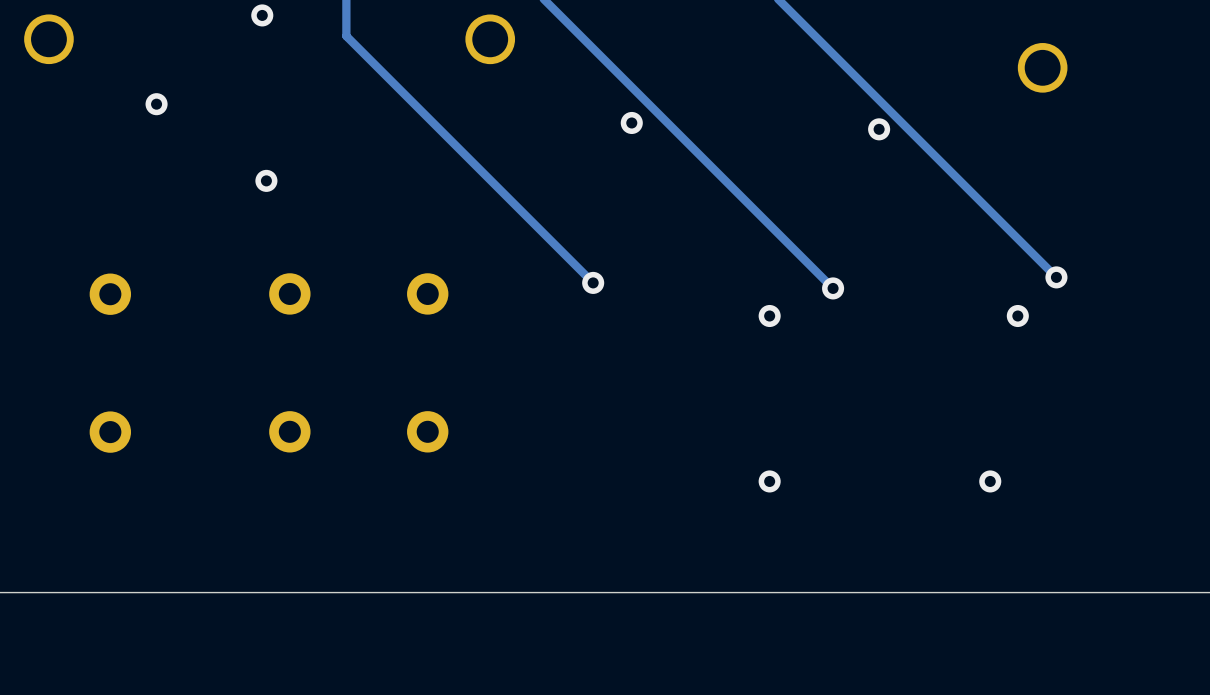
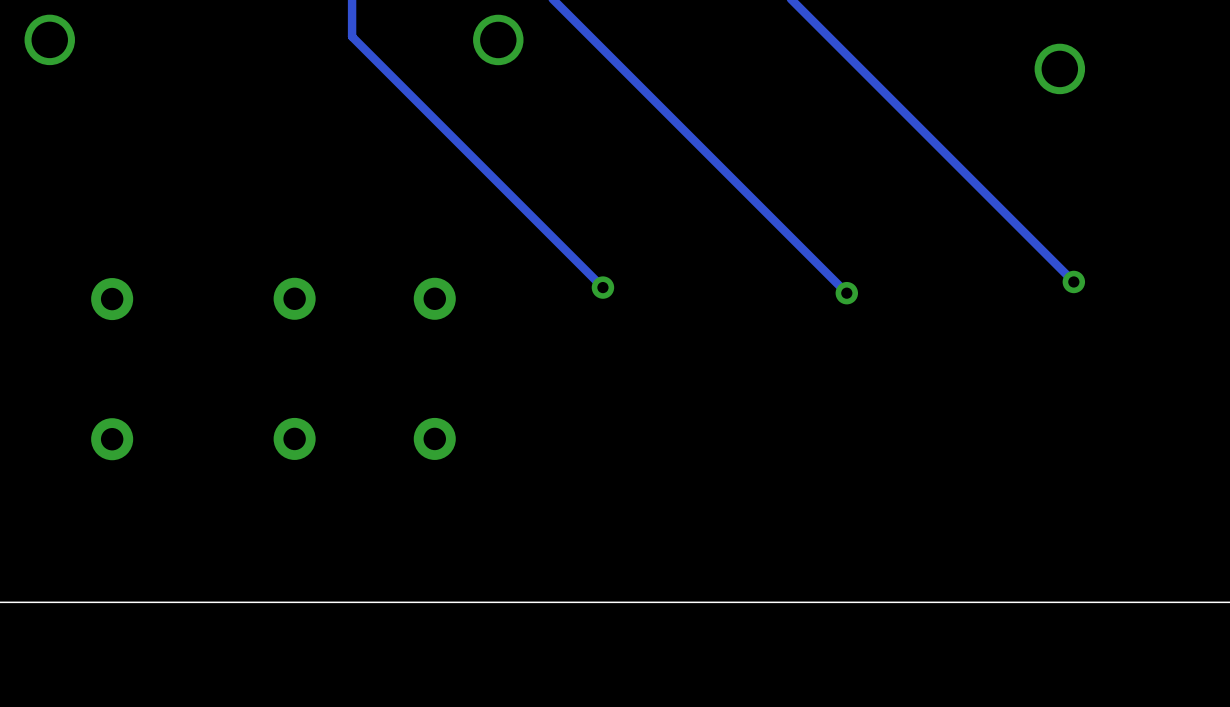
via: (262, 15) -> none
via: (156, 104) -> none
via: (631, 122) -> none
via: (879, 129) -> none
via: (266, 180) -> none
via: (769, 316) -> none
via: (1017, 316) -> none
via: (769, 481) -> none
via: (990, 481) -> none

